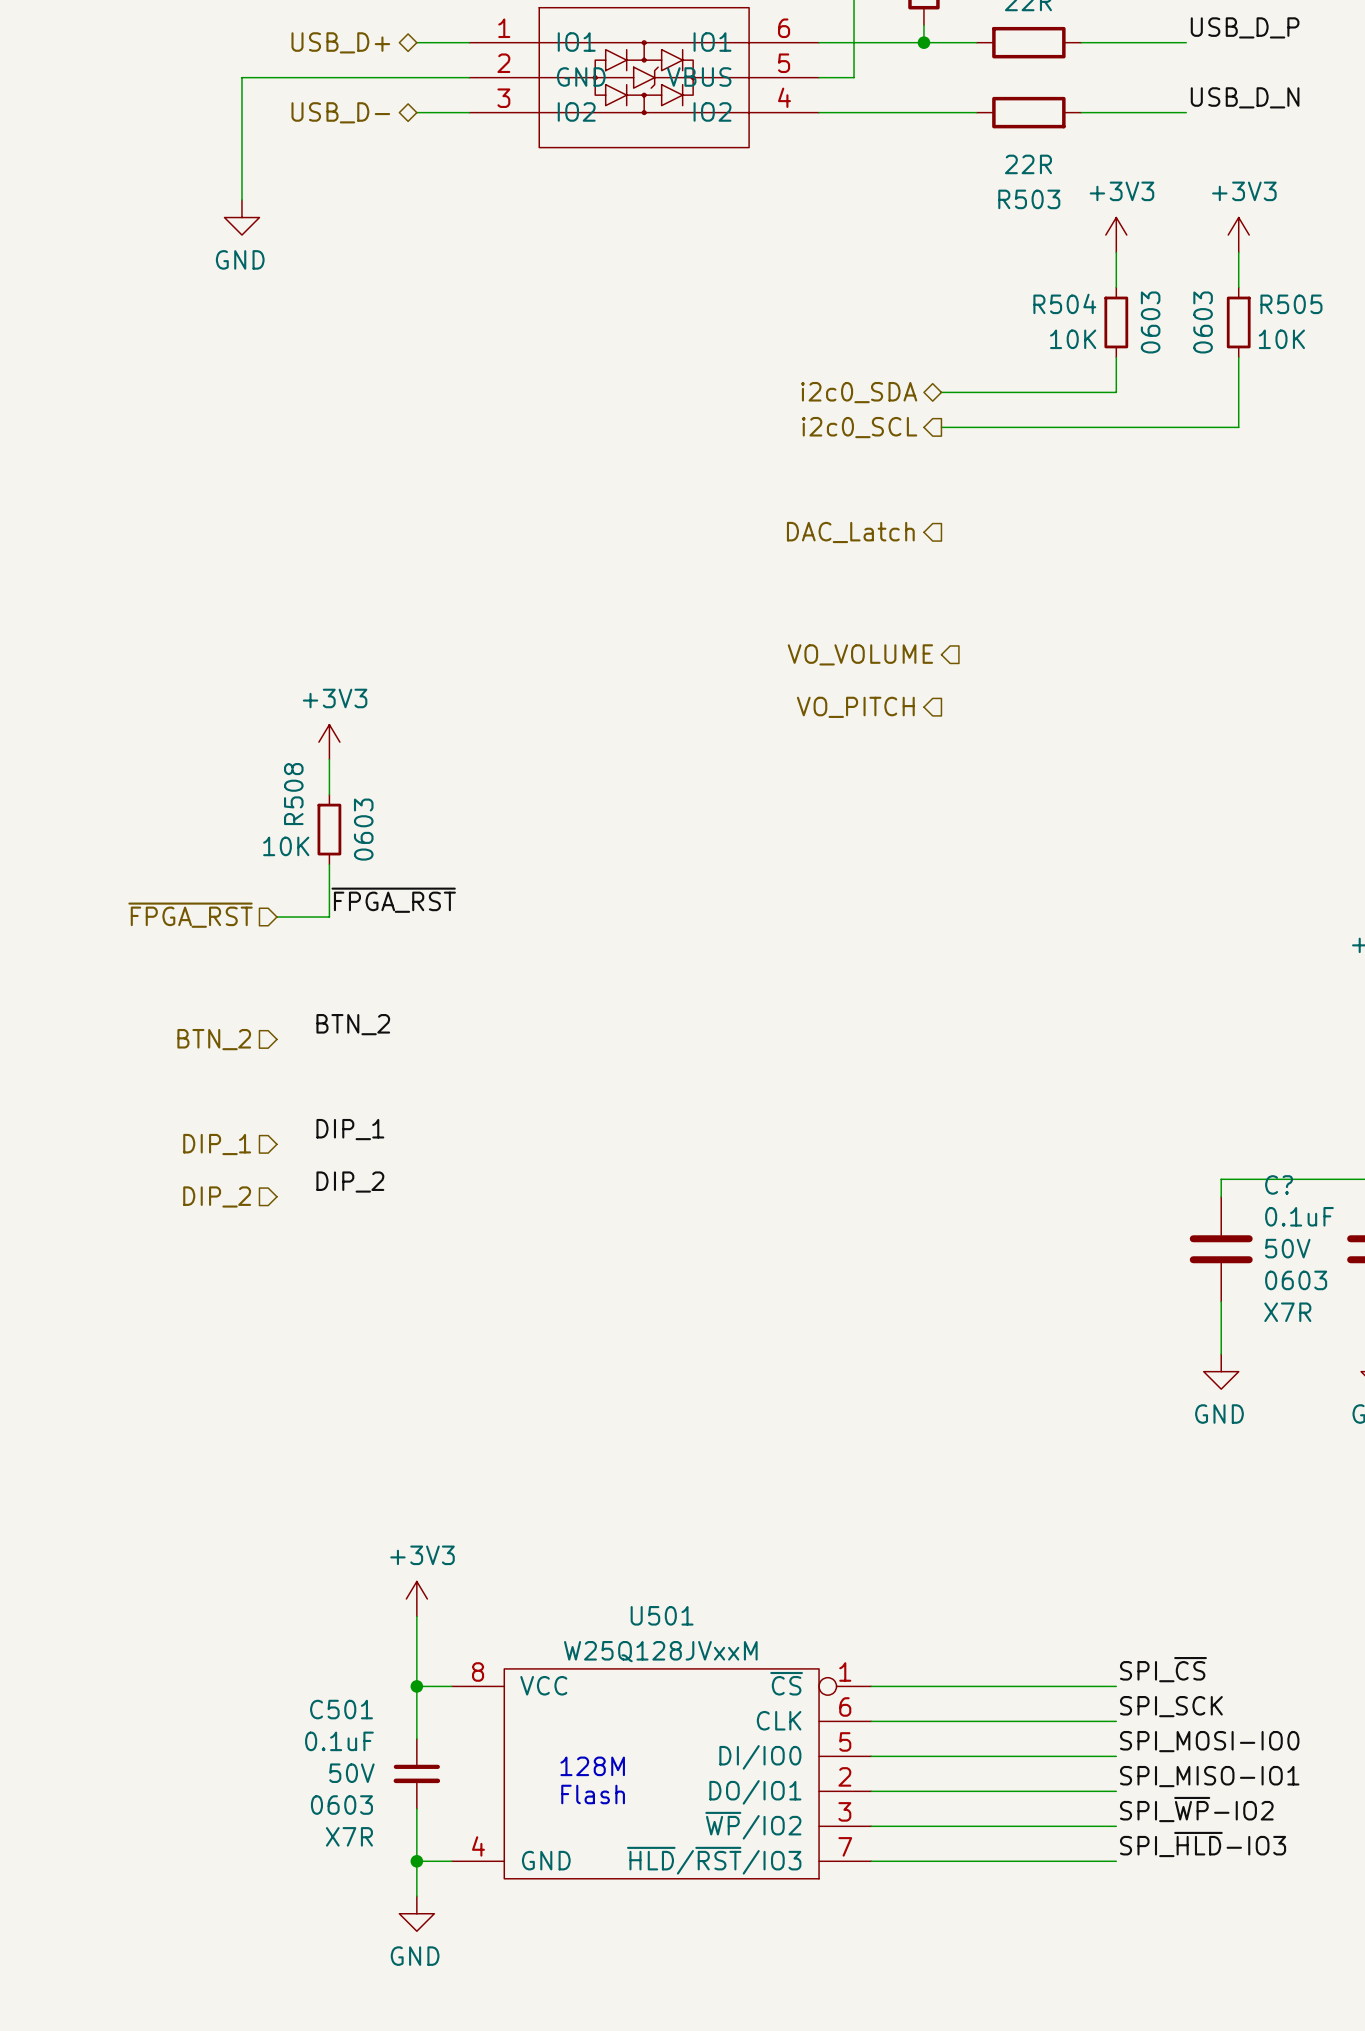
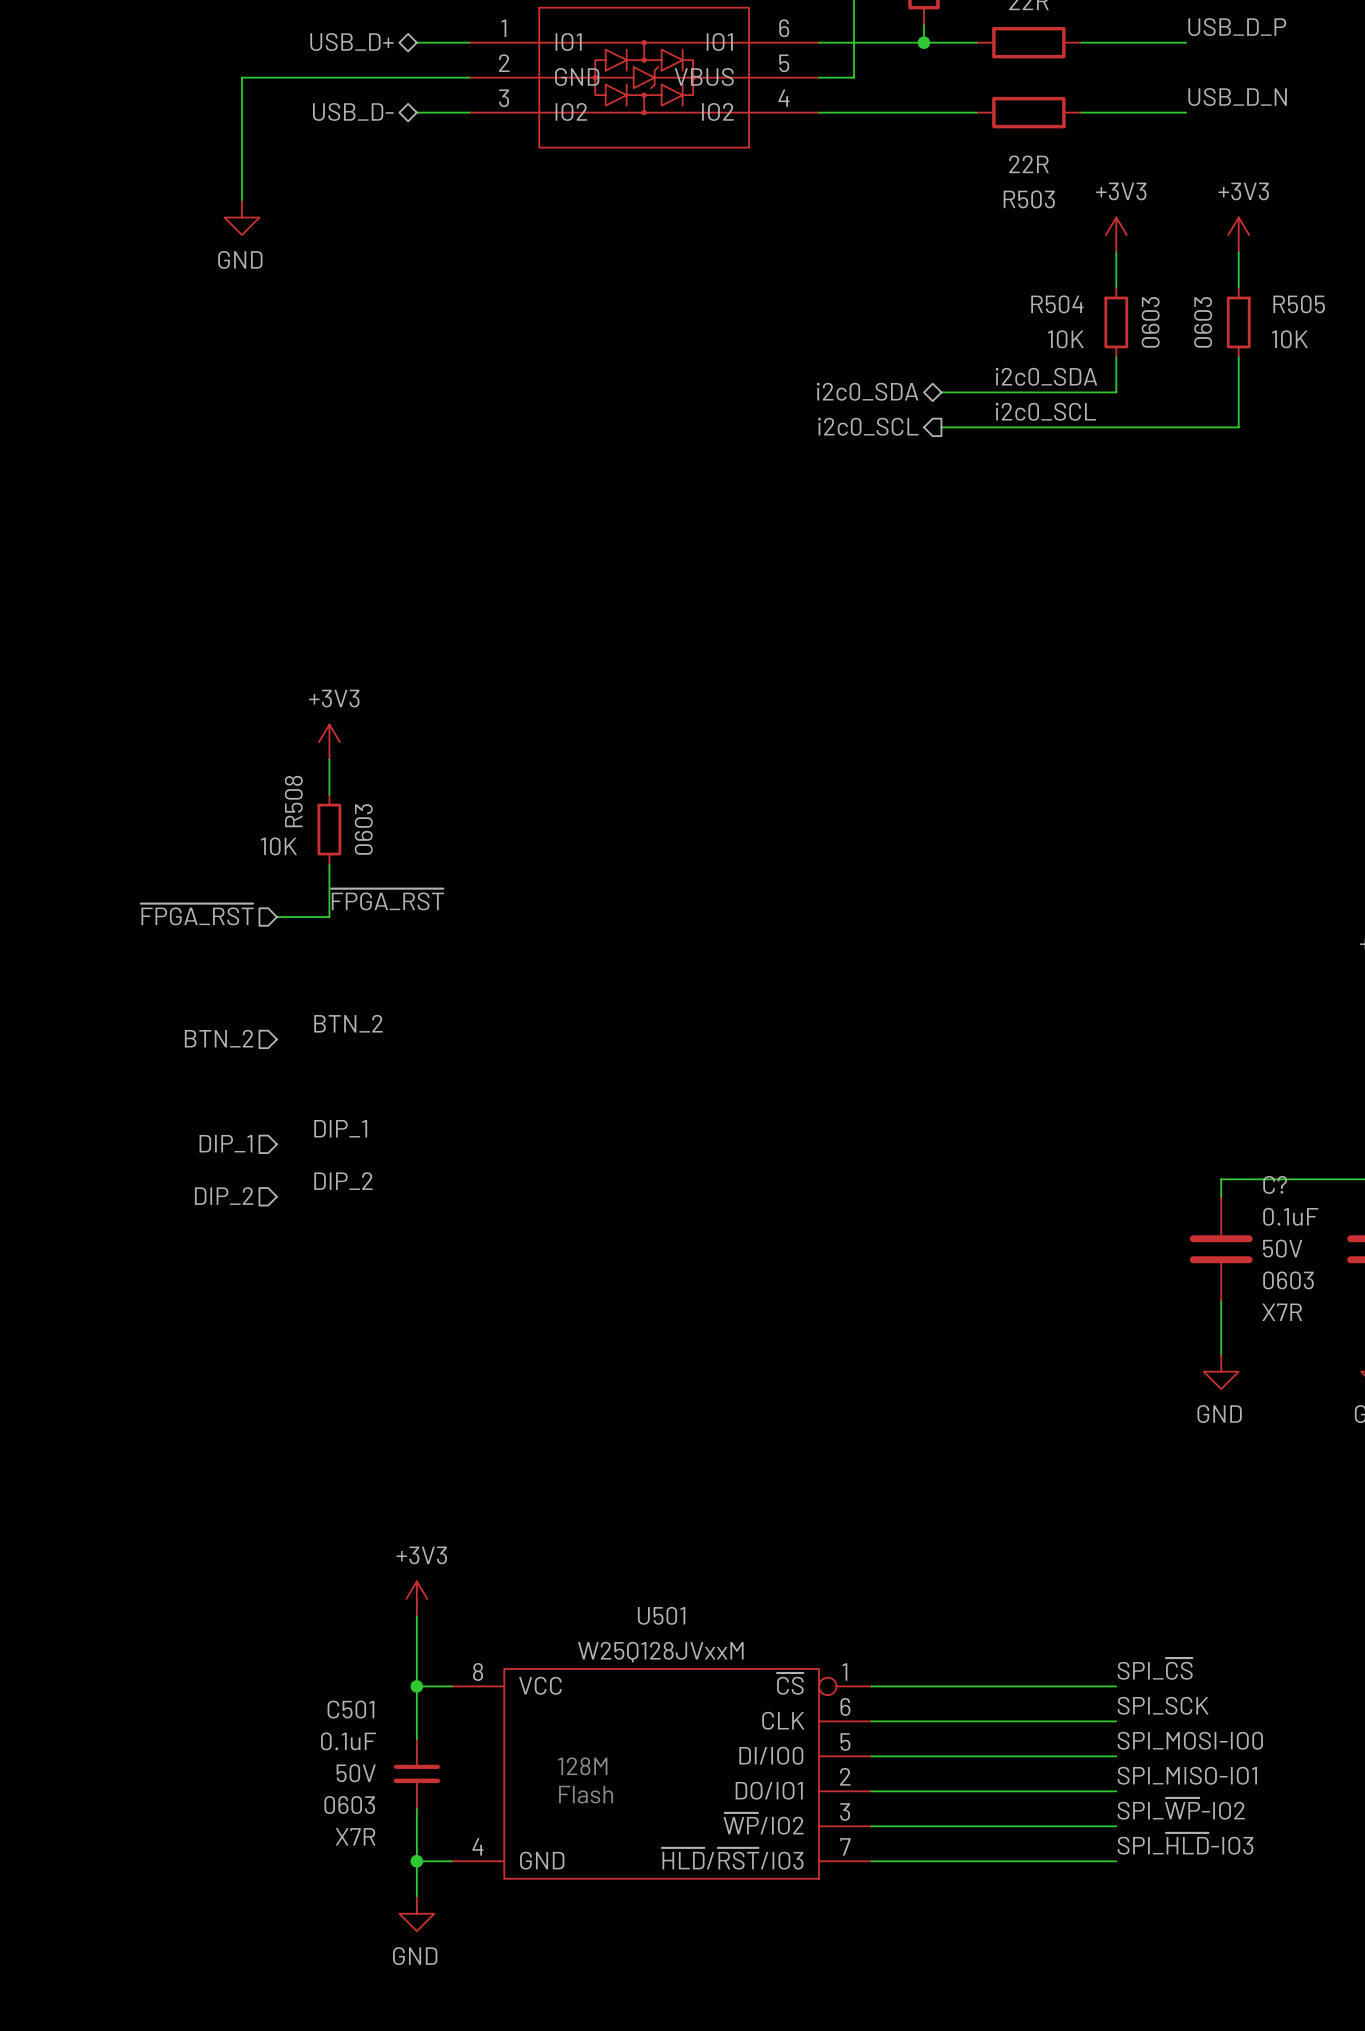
label: none -> i2c0_SDA (1046, 376)
label: none -> i2c0_SCL (1045, 411)
hierarchical label: DAC_Latch (850, 532) -> none
hierarchical label: VO_VOLUME (860, 654) -> none
hierarchical label: VO_PITCH (855, 707) -> none

